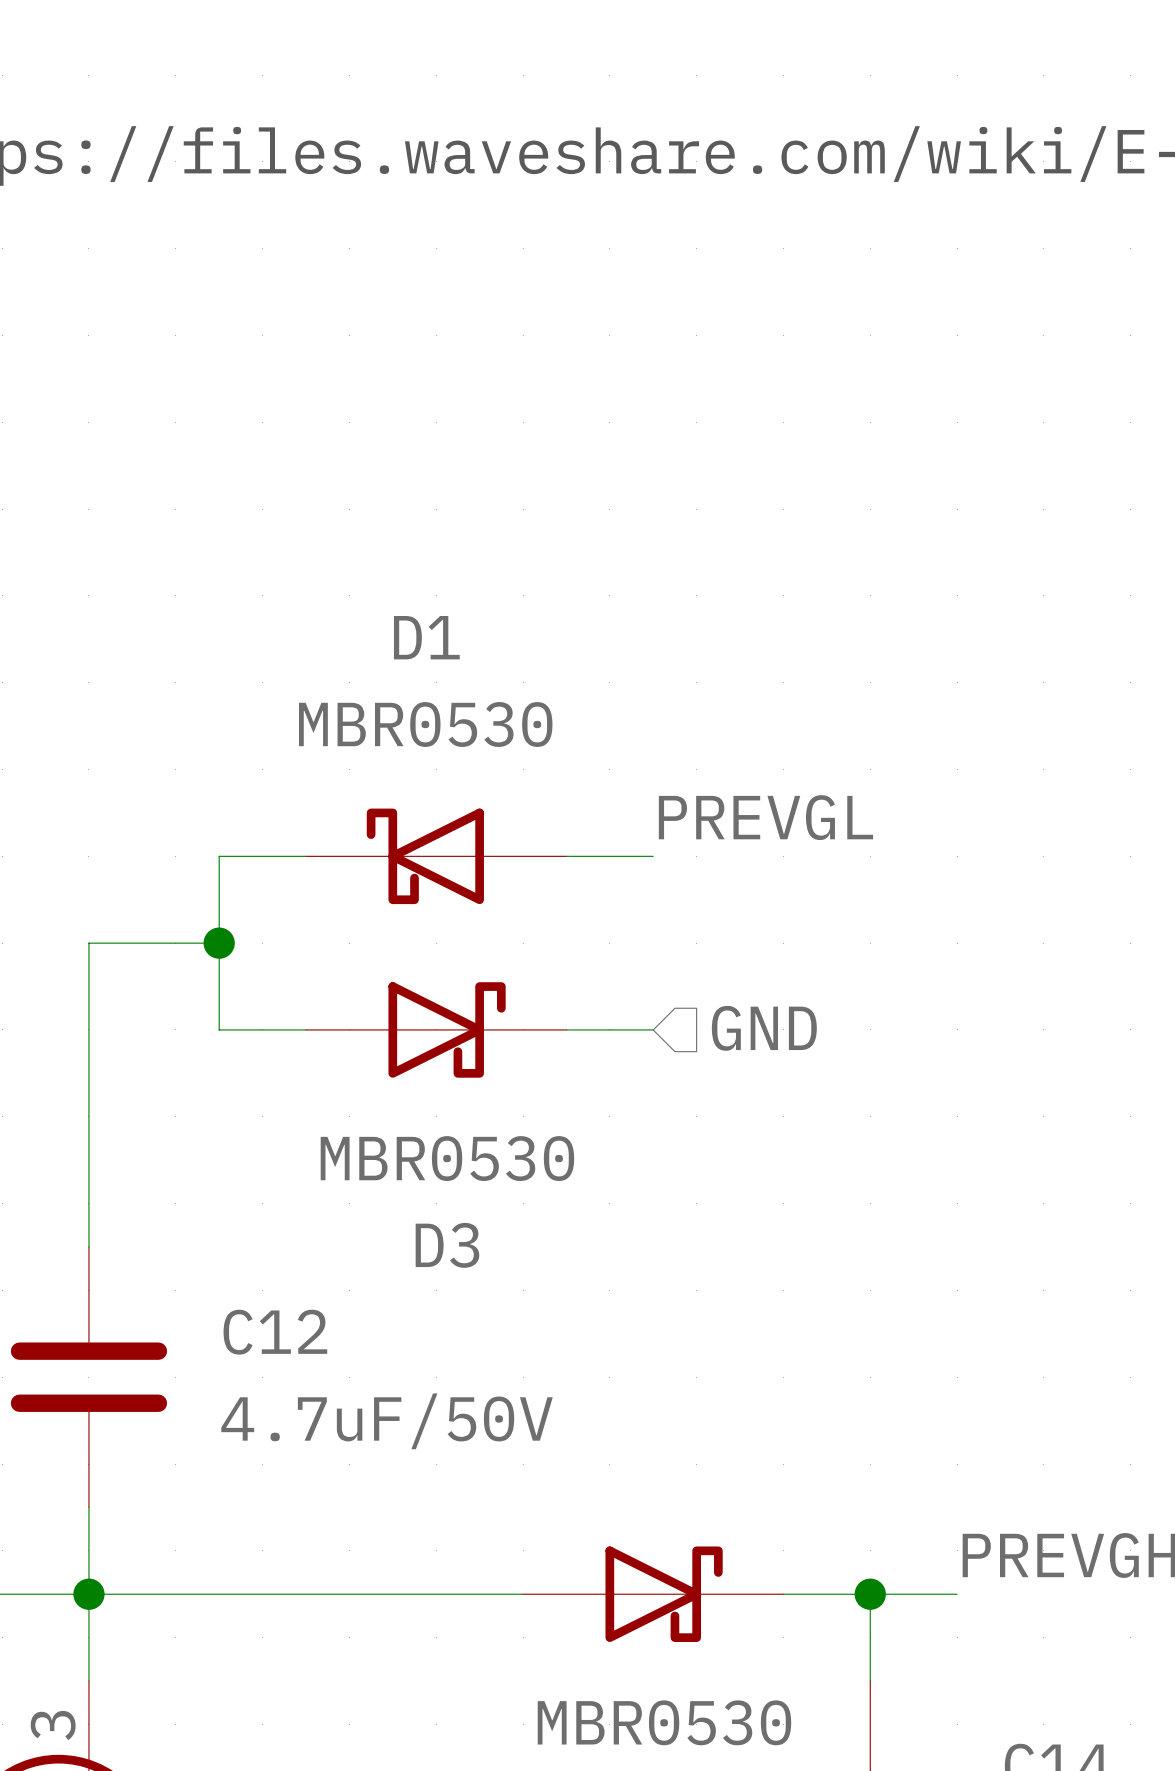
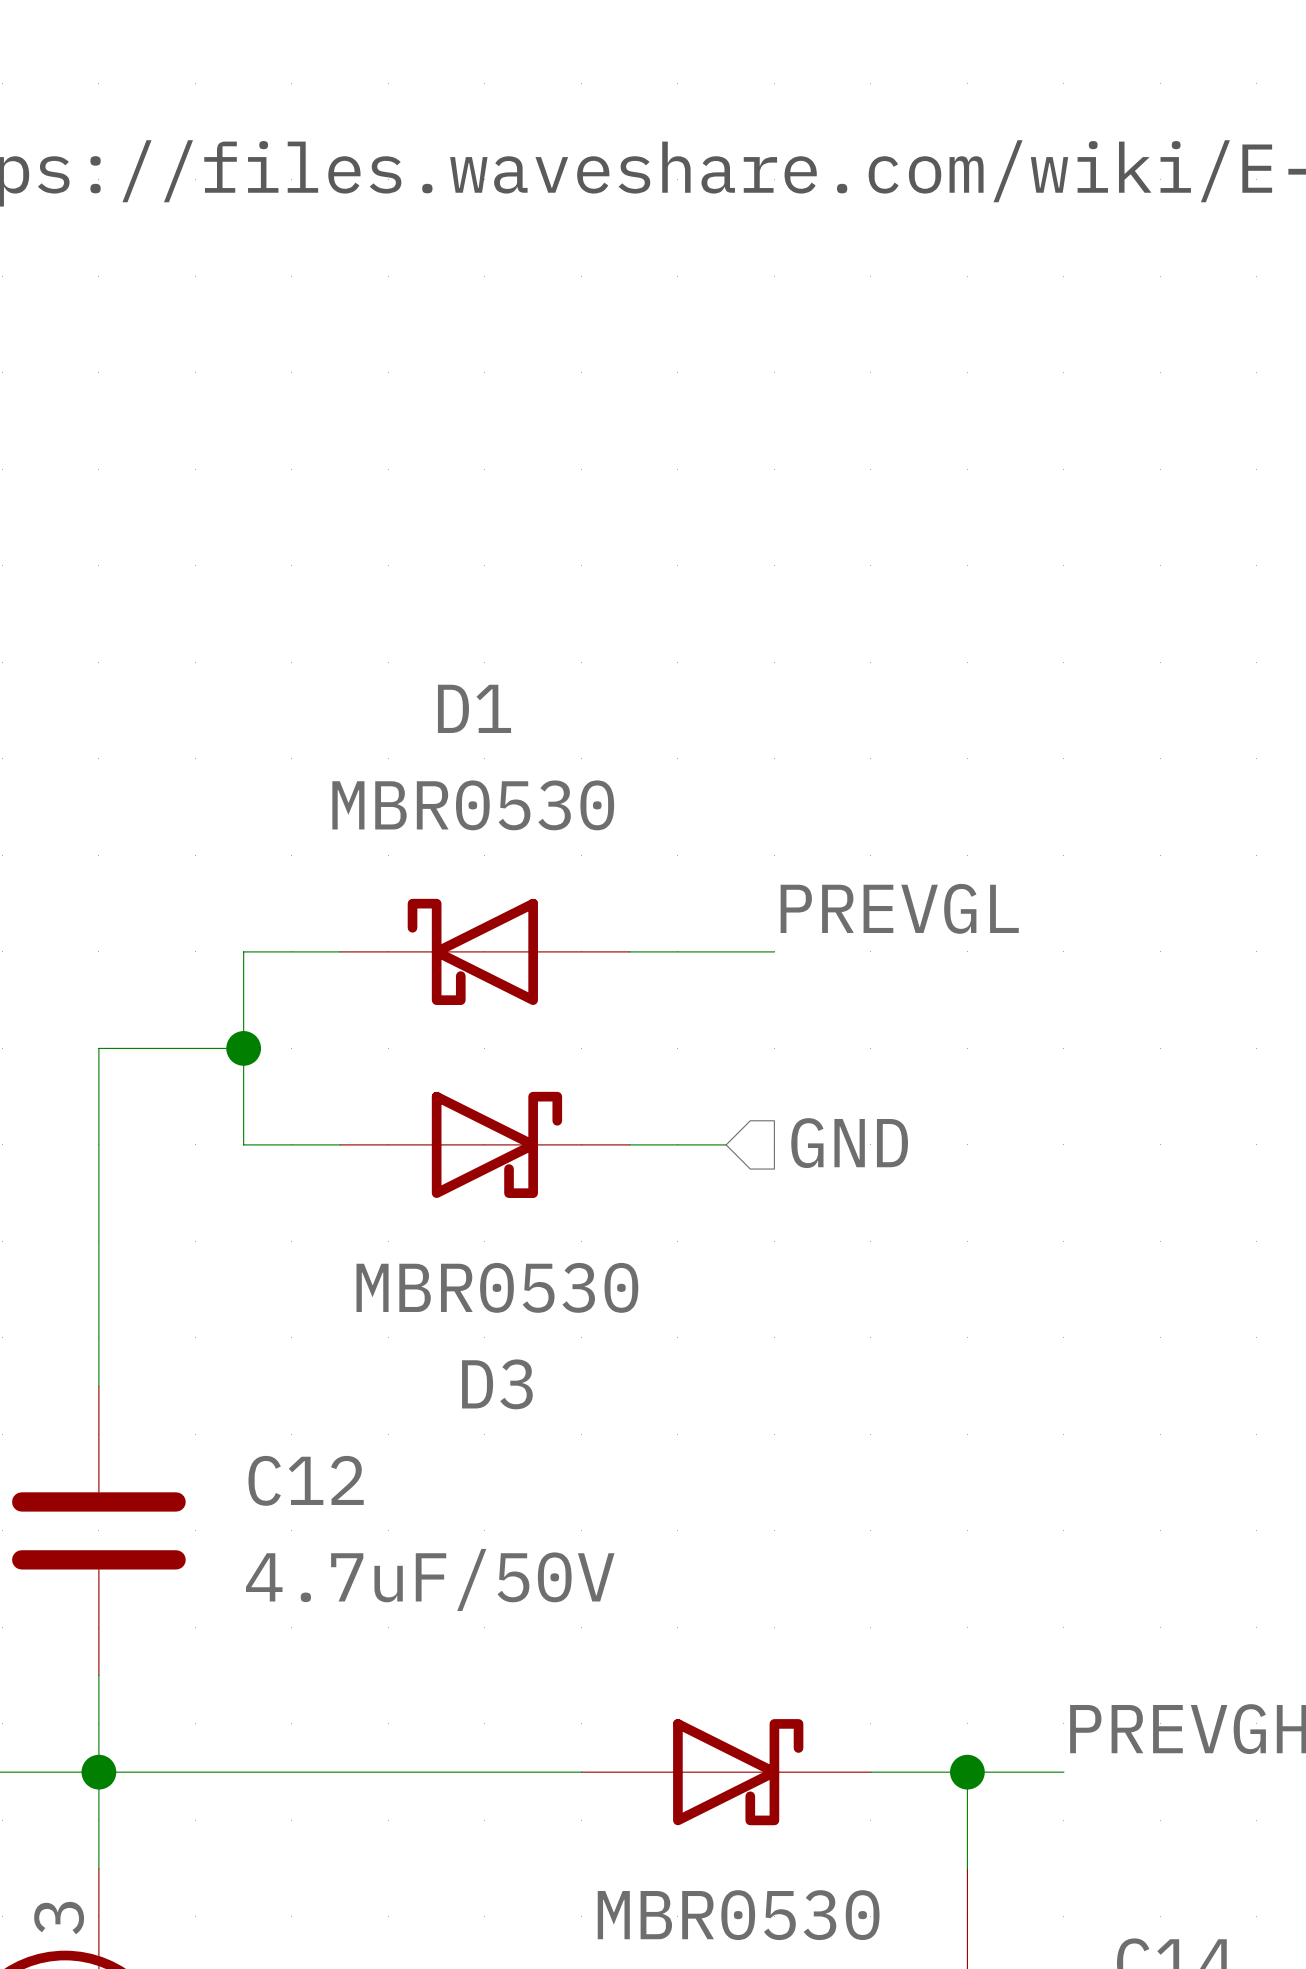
label position: PREVGL (765, 817) -> PREVGL (899, 908)
wire: none -> (726, 951) (774, 951)

